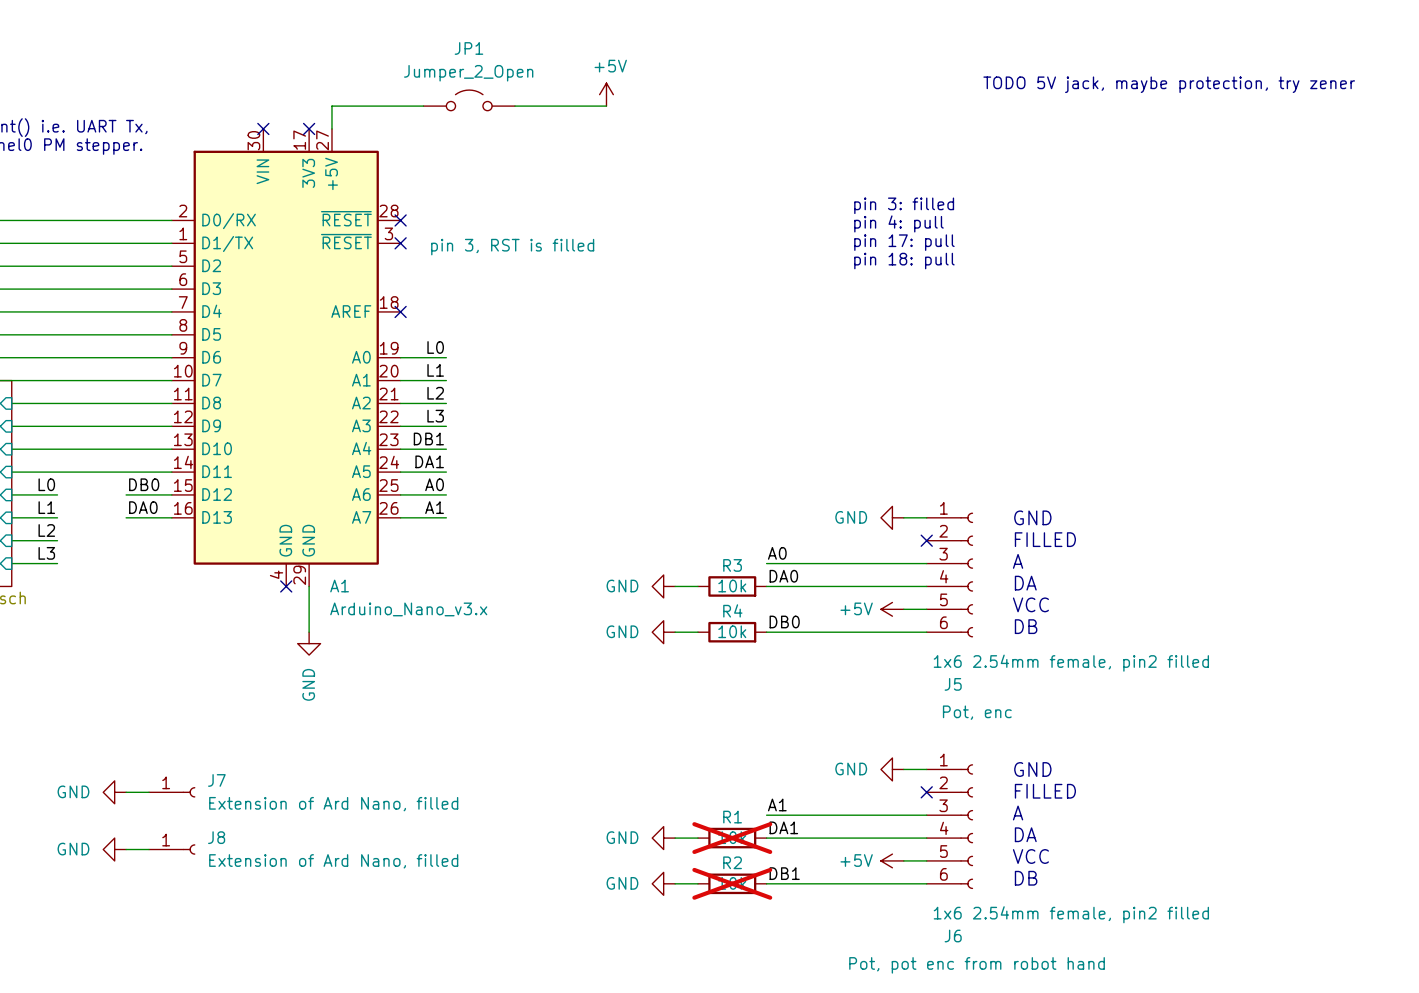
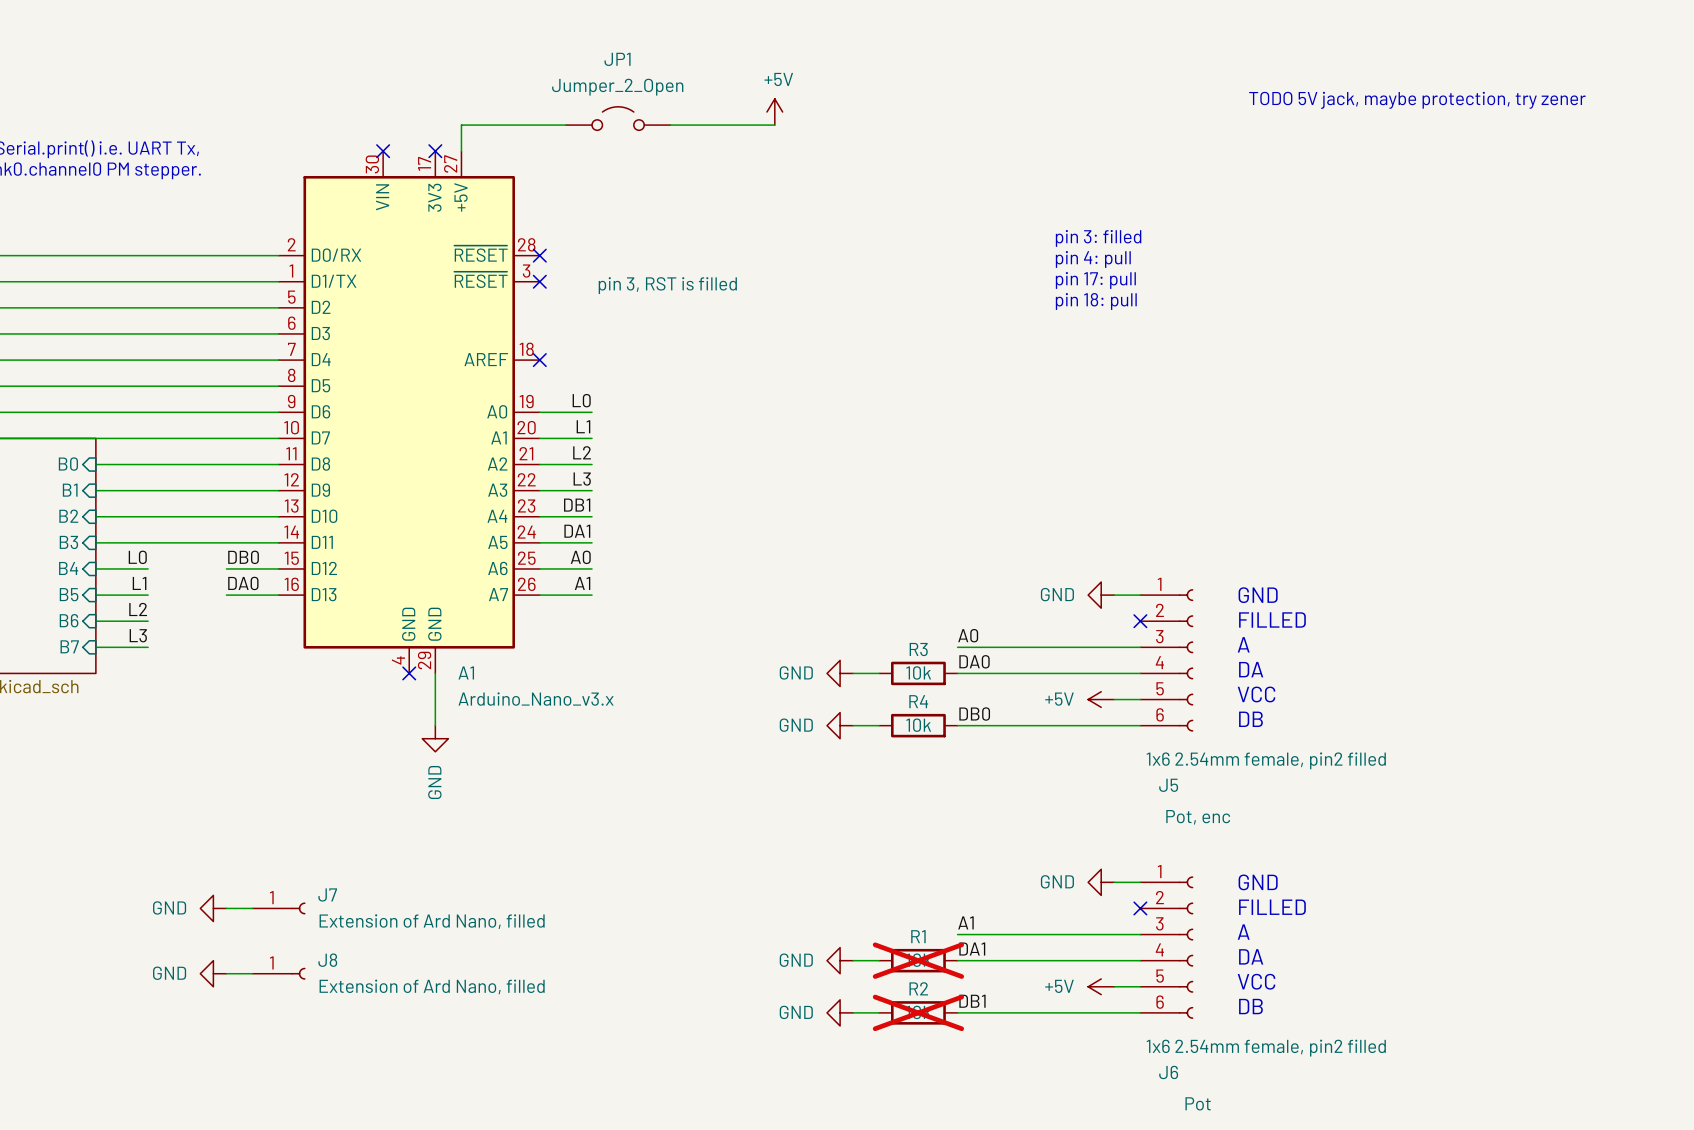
J6 text: Pot, pot enc from robot hand (977, 965) -> Pot (1198, 1103)

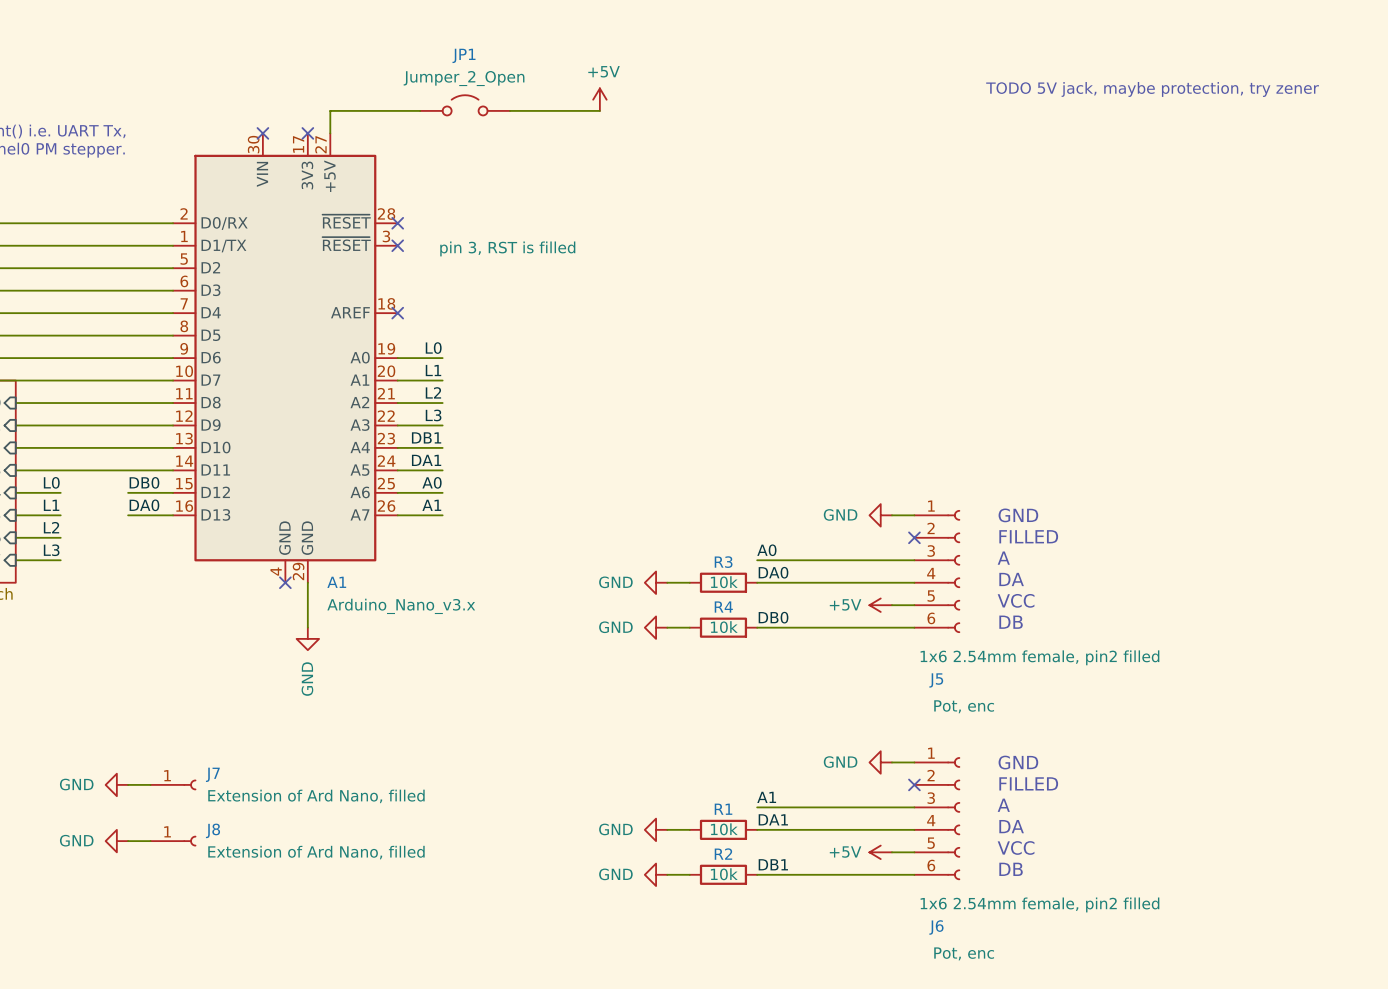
text: pin 3: filled (1098, 238) -> none
text: pin 4: pull (1093, 259) -> none
text: pin 17: pull (1095, 280) -> none
text: pin 18: pull (1096, 301) -> none
R1 do-not-place cross: (918, 960) -> none
R2 do-not-place cross: (918, 1012) -> none
J6 text: Pot (1198, 1103) -> Pot, enc (964, 953)

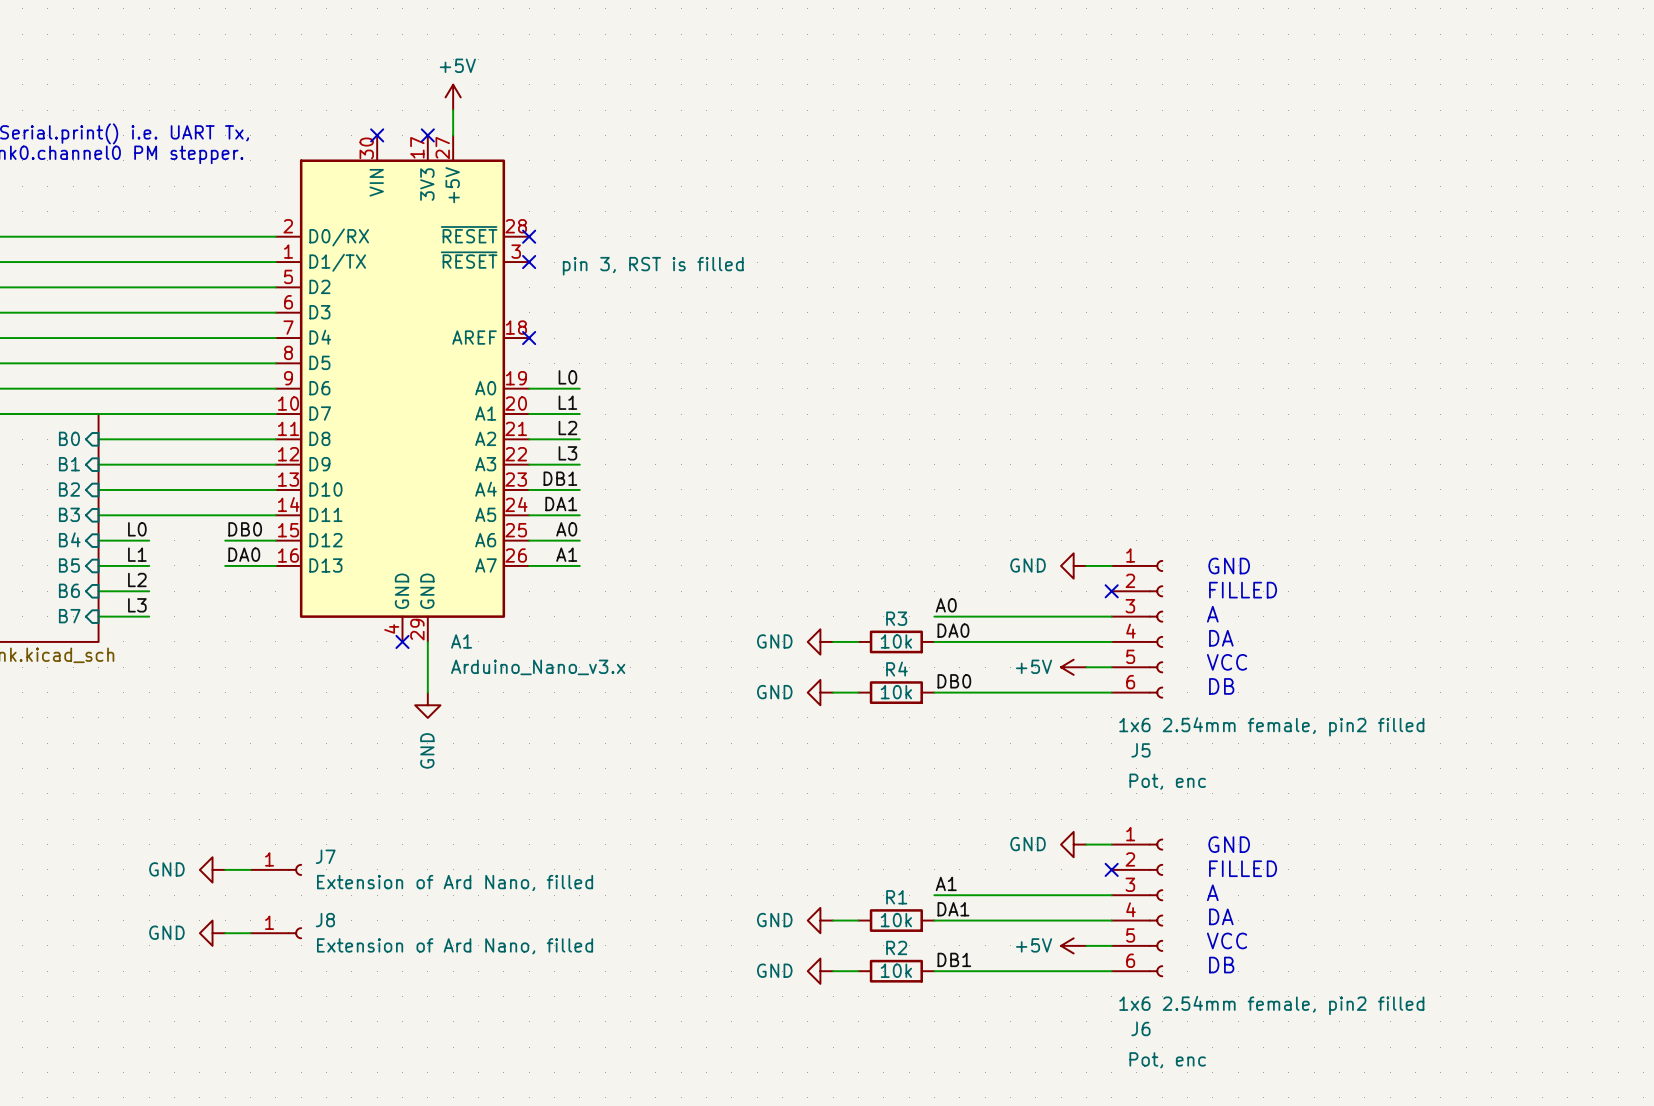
text: TODO 5V jack, maybe protection, try zener (1152, 89) -> none
power symbol: none -> +5V (453, 97)
power symbol: +5V (599, 99) -> none
JP1: Jumper_2_Open (465, 105) -> none
wire: (330, 110) (420, 110) -> none
wire: (510, 110) (599, 110) -> none

